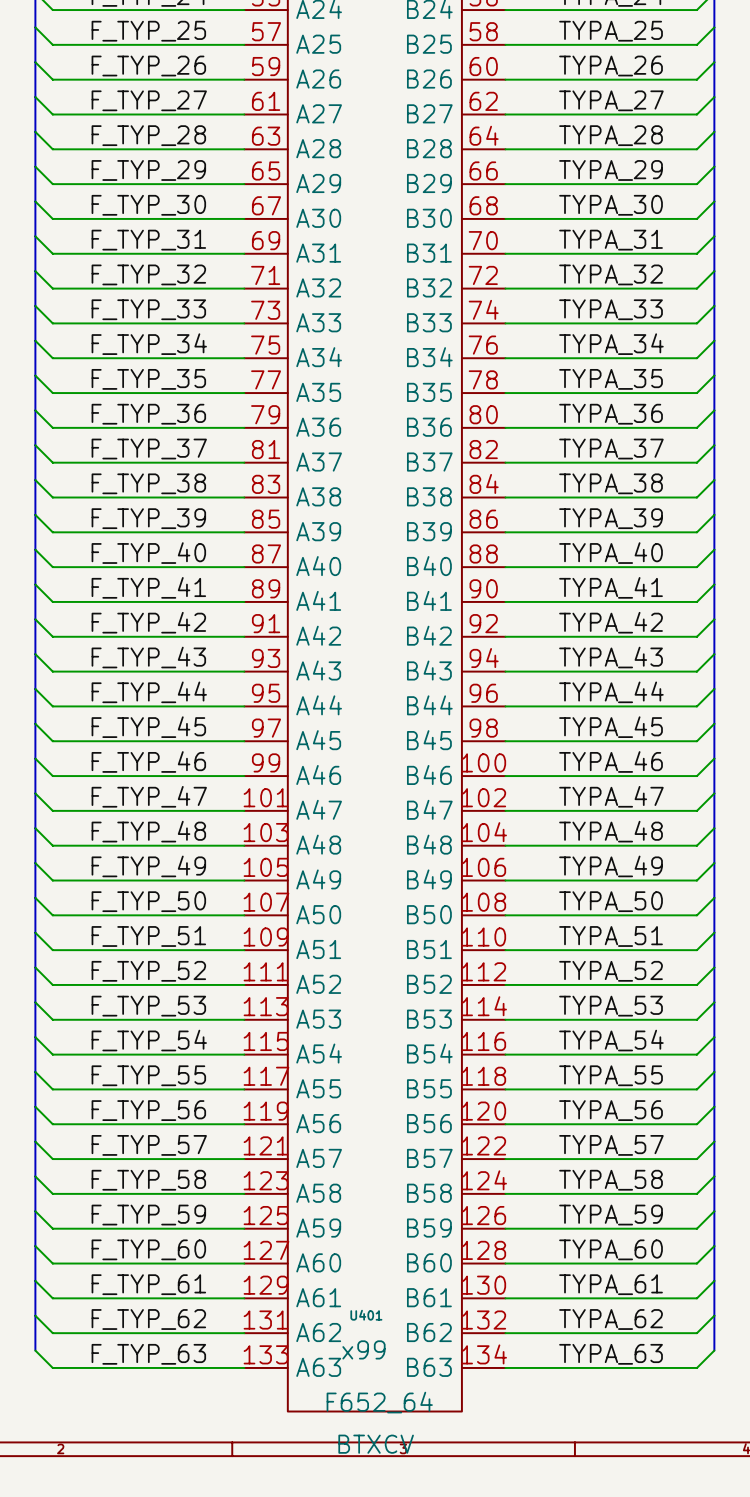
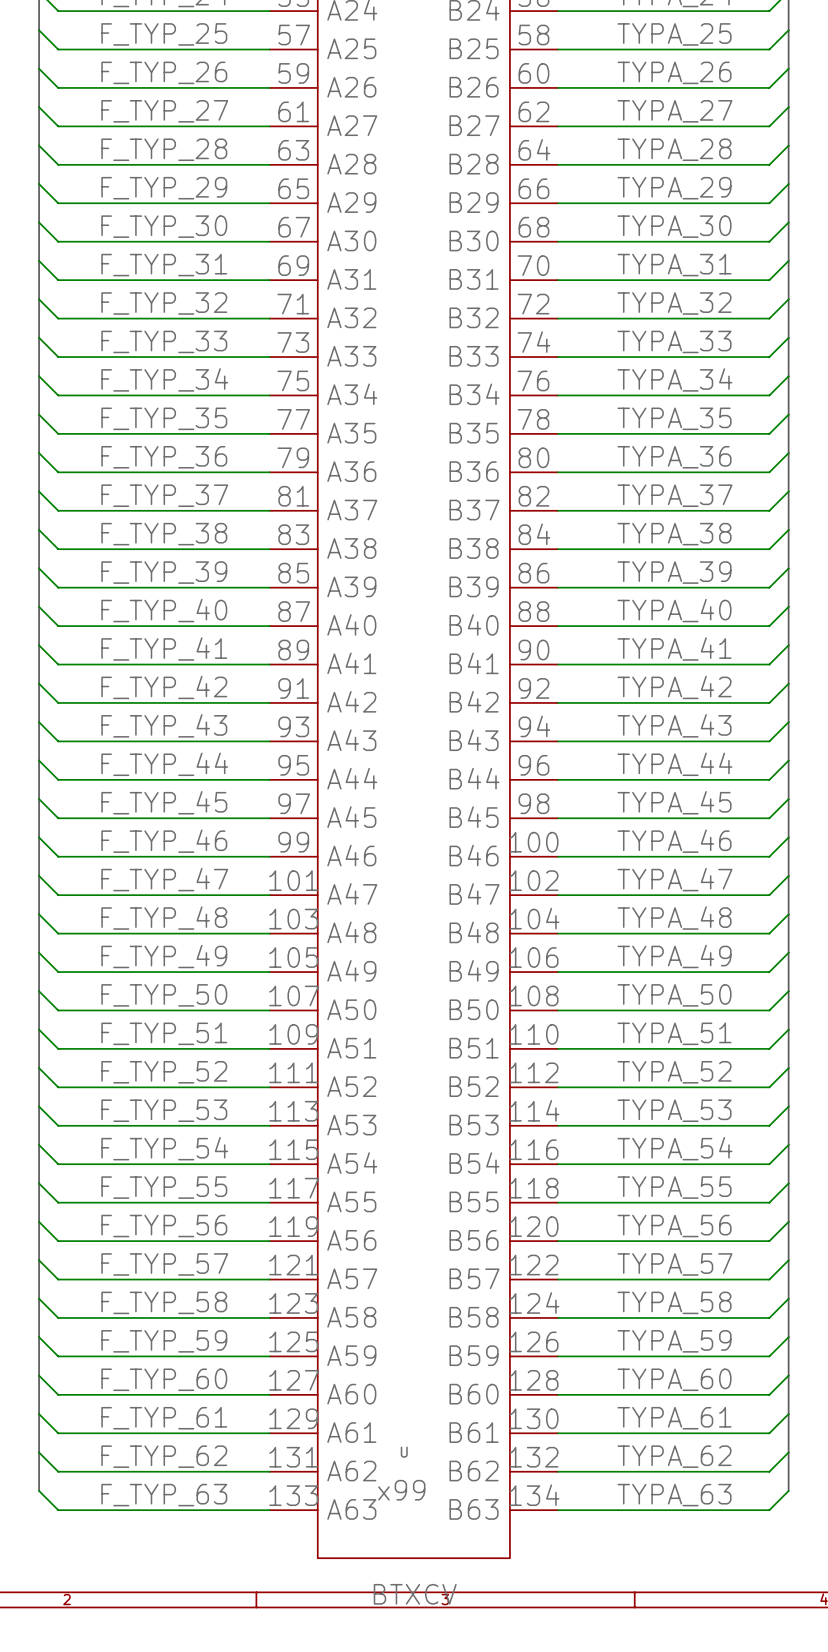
U401 name: U401 (366, 1315) -> U (404, 1452)
U401 value: F652_64 (379, 1402) -> none

